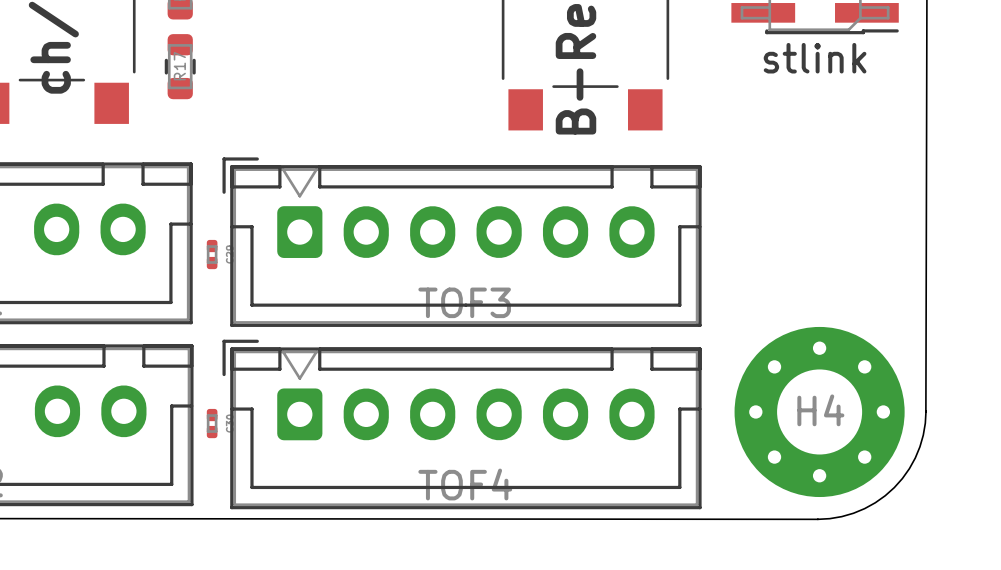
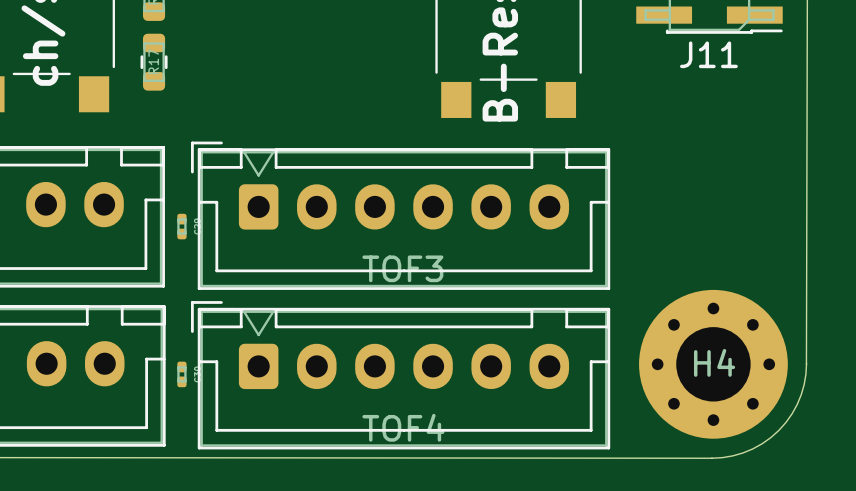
stlink name: stlink (815, 58) -> J11 (708, 54)

